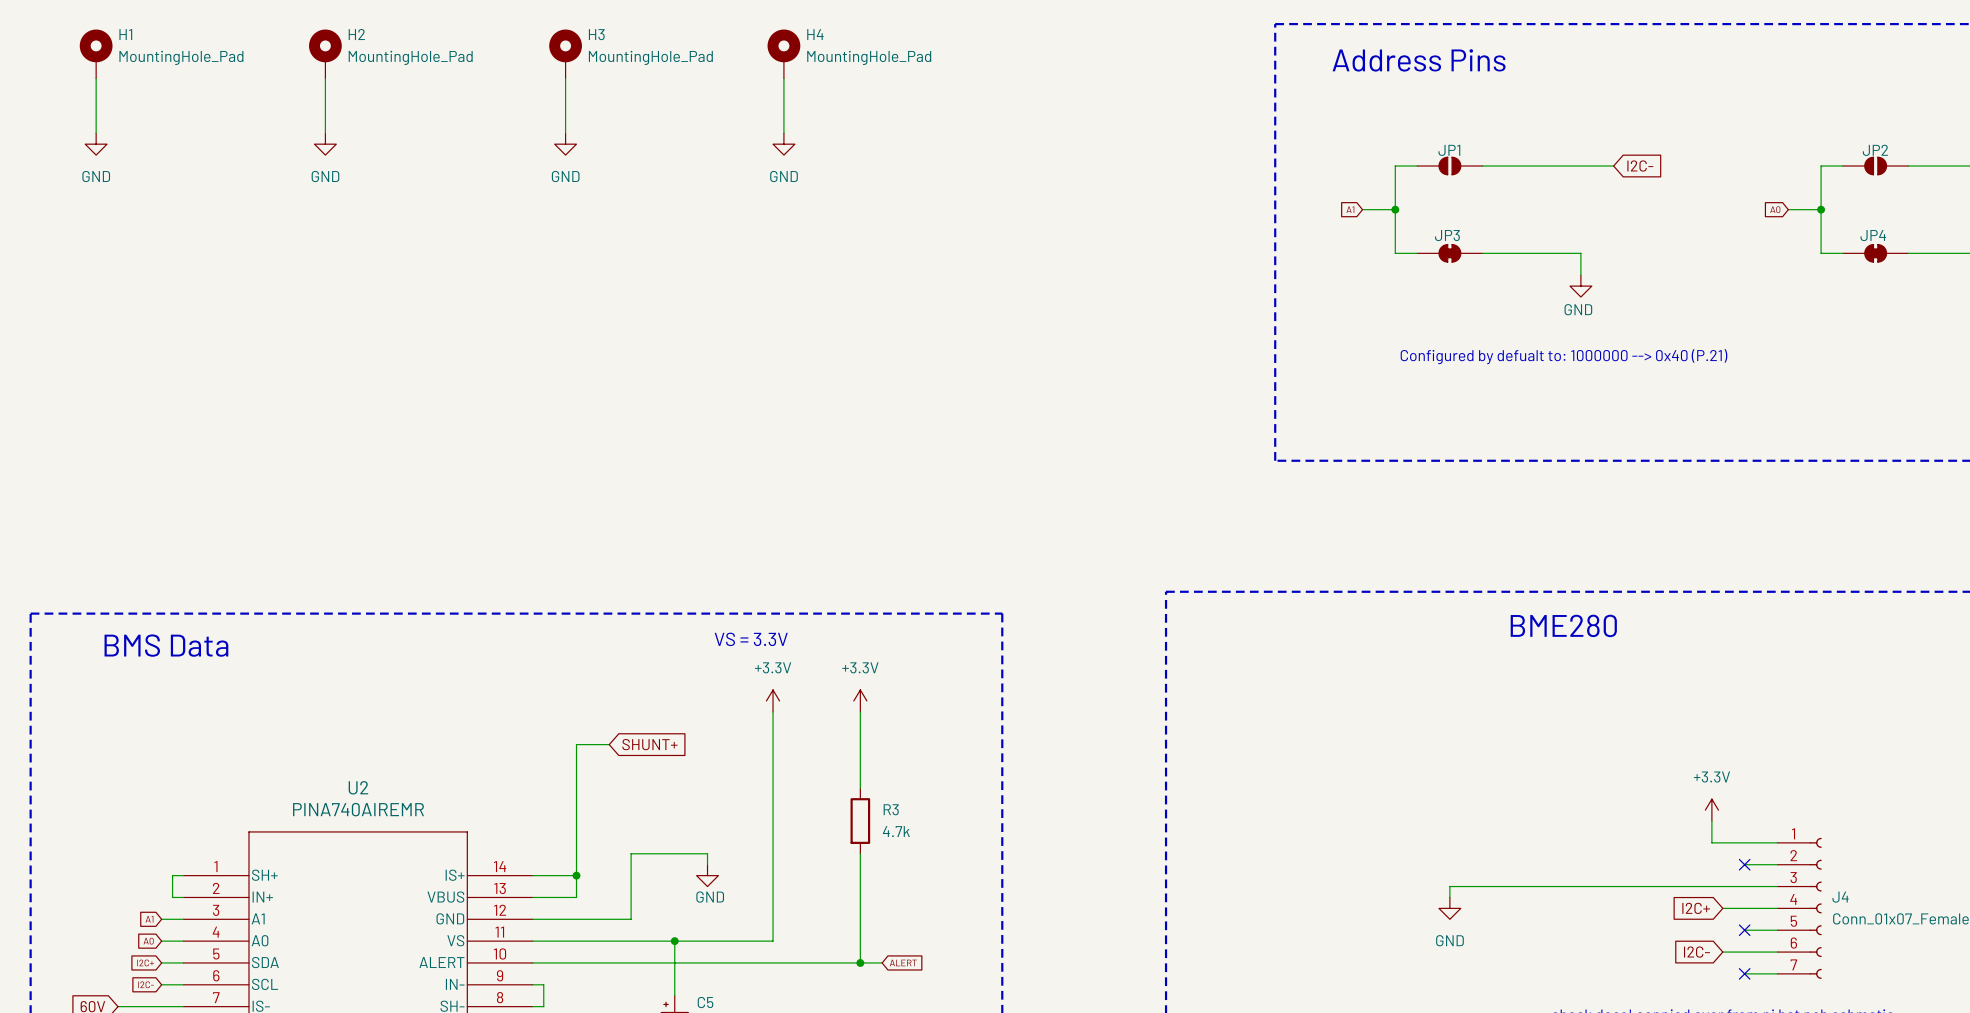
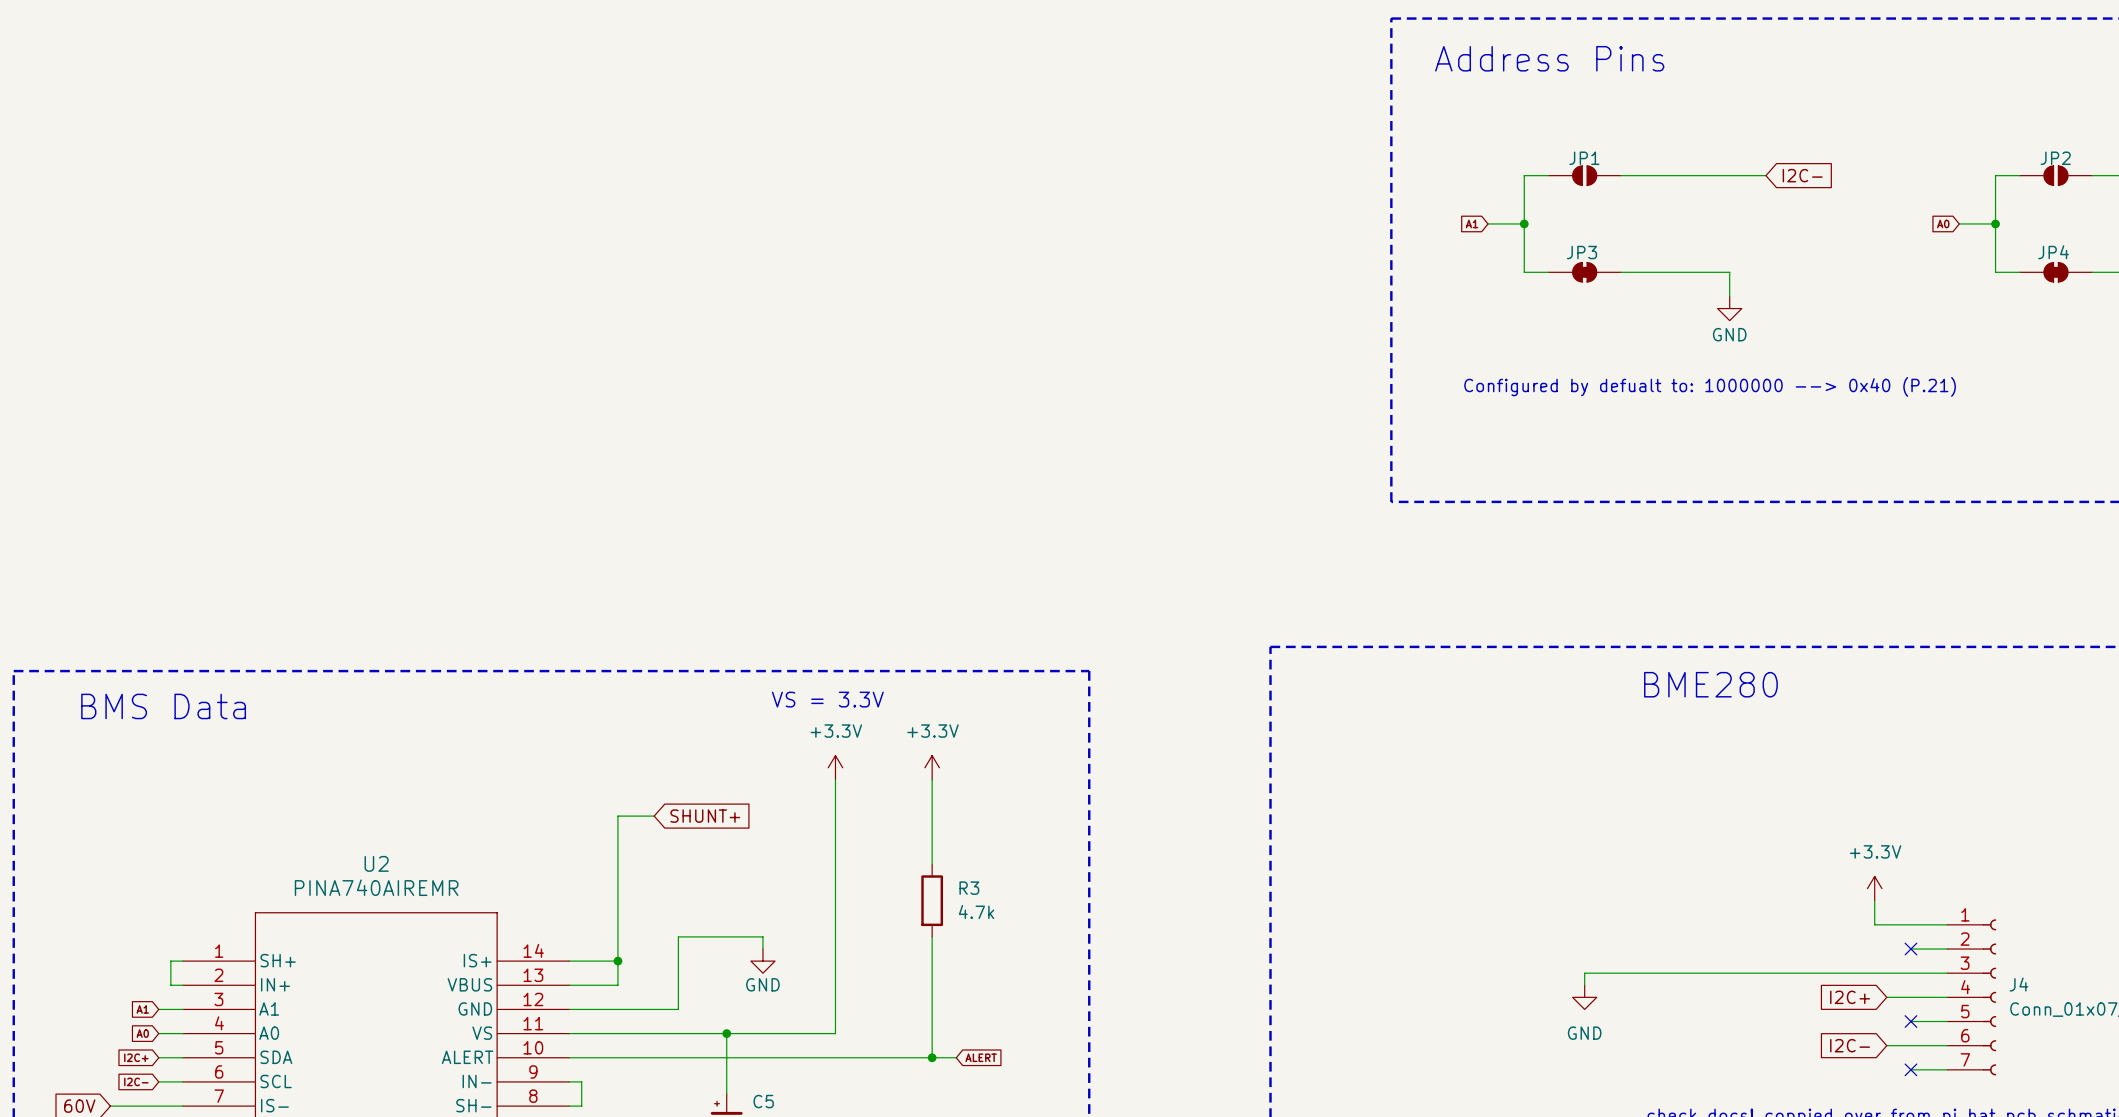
H1: MountingHole_Pad (96, 54) -> none
H2: MountingHole_Pad (325, 54) -> none
H3: MountingHole_Pad (565, 54) -> none
H4: MountingHole_Pad (783, 54) -> none
wire: (96, 78) (96, 133) -> none
wire: (325, 78) (325, 133) -> none
wire: (565, 78) (565, 133) -> none
wire: (783, 78) (783, 133) -> none
power symbol: GND (96, 144) -> none
power symbol: GND (325, 144) -> none
power symbol: GND (565, 144) -> none
power symbol: GND (783, 144) -> none

